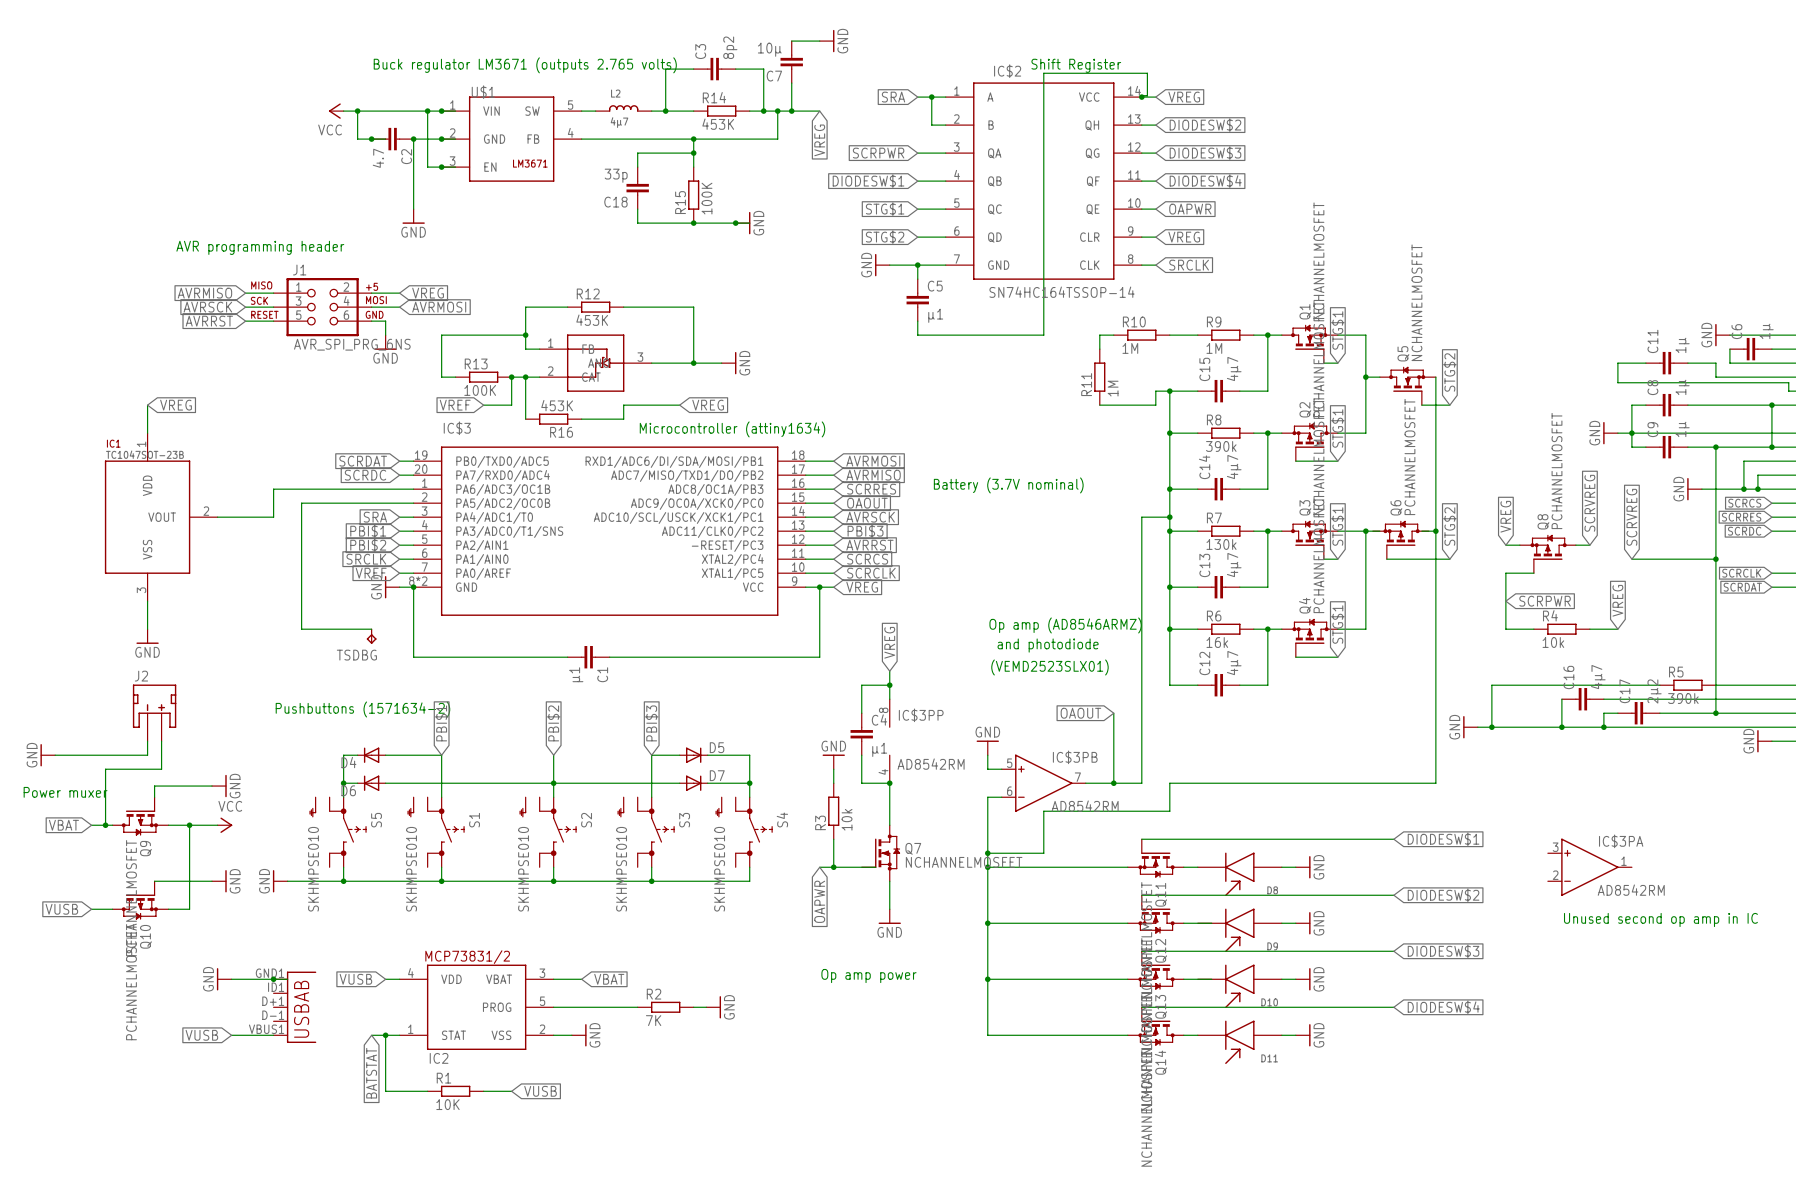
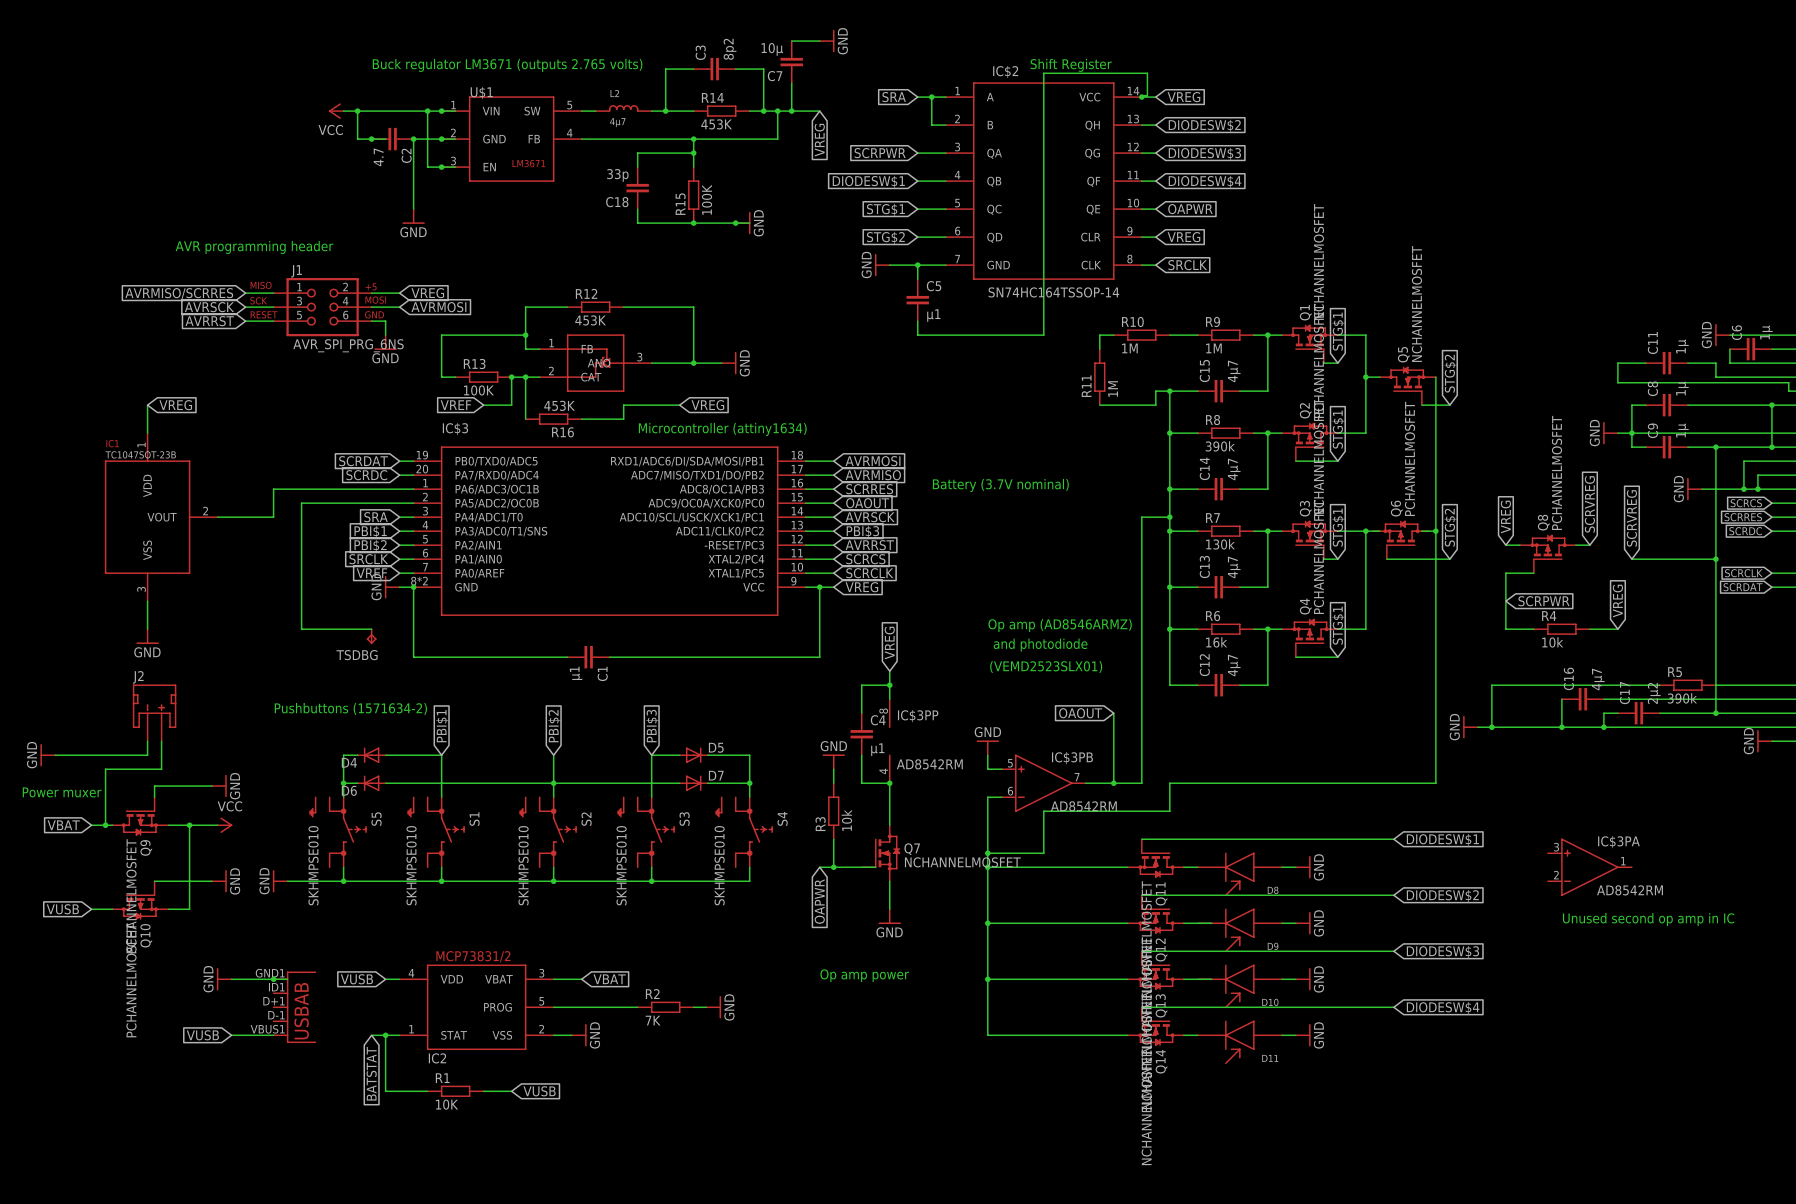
global label: AVRMISO (204, 293) -> AVRMISO/SCRRES (179, 293)

